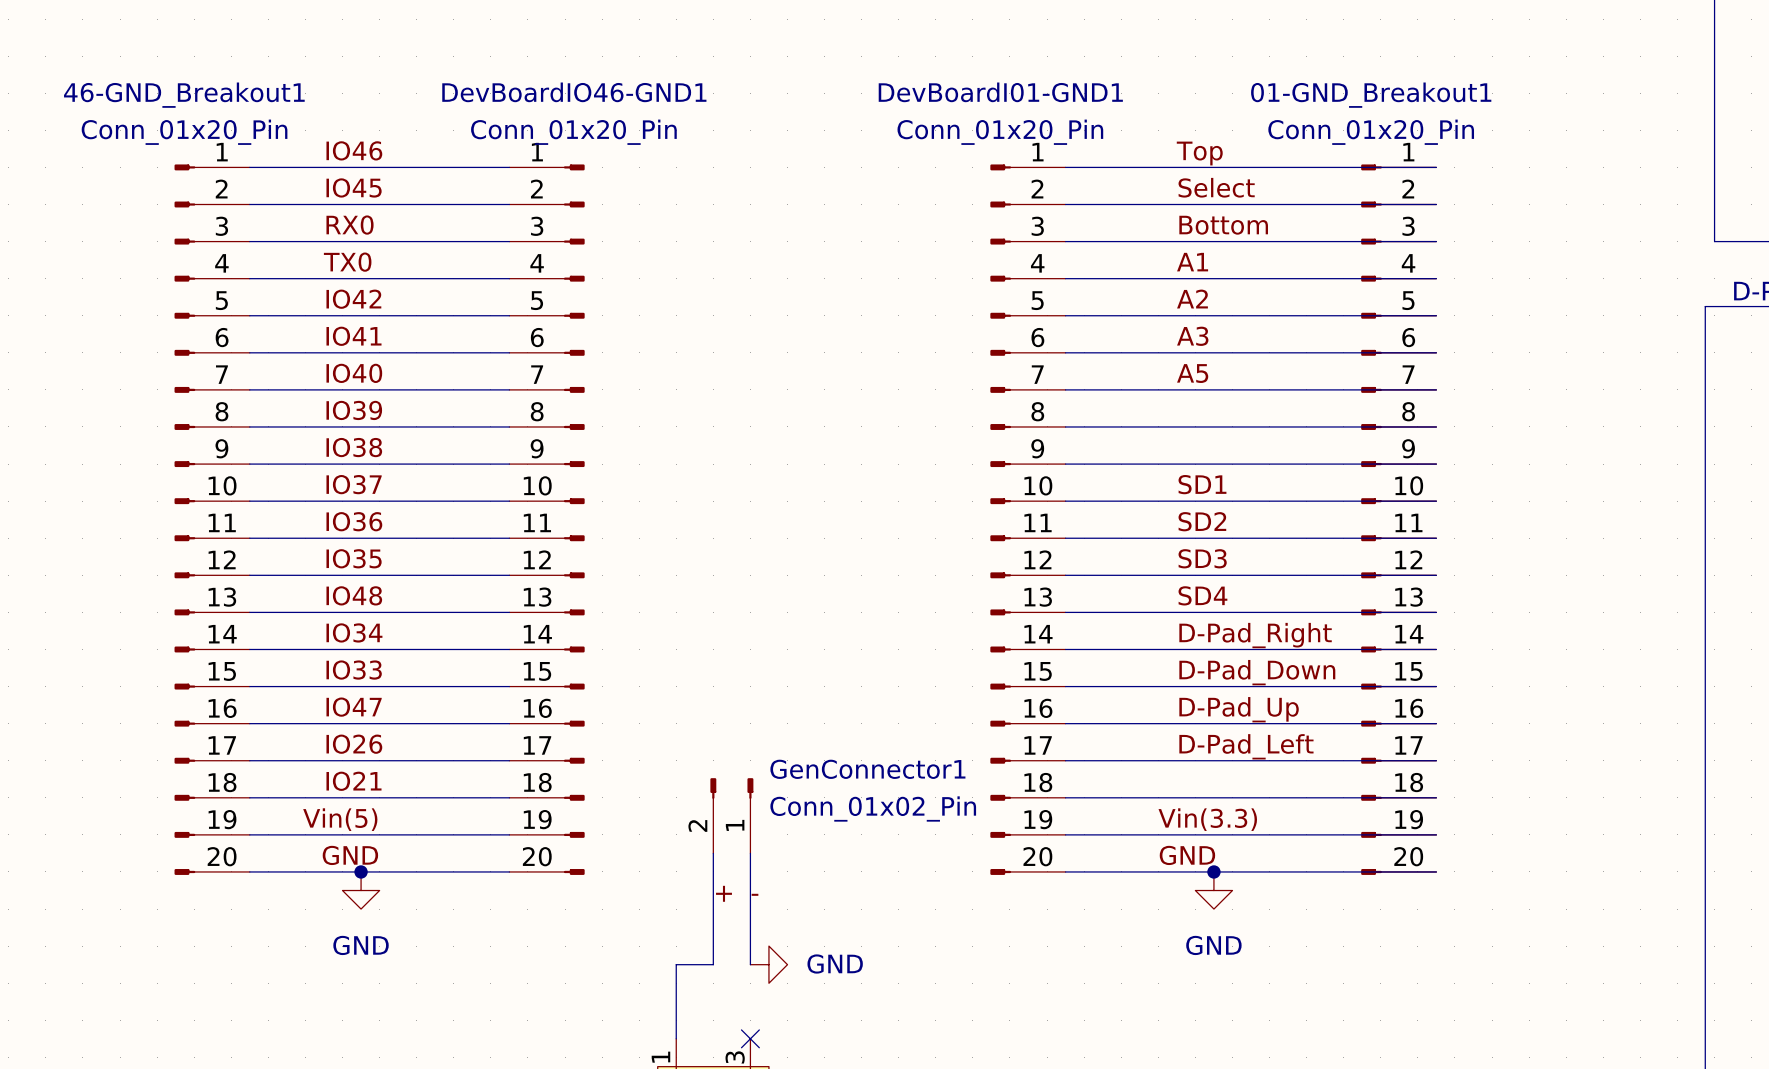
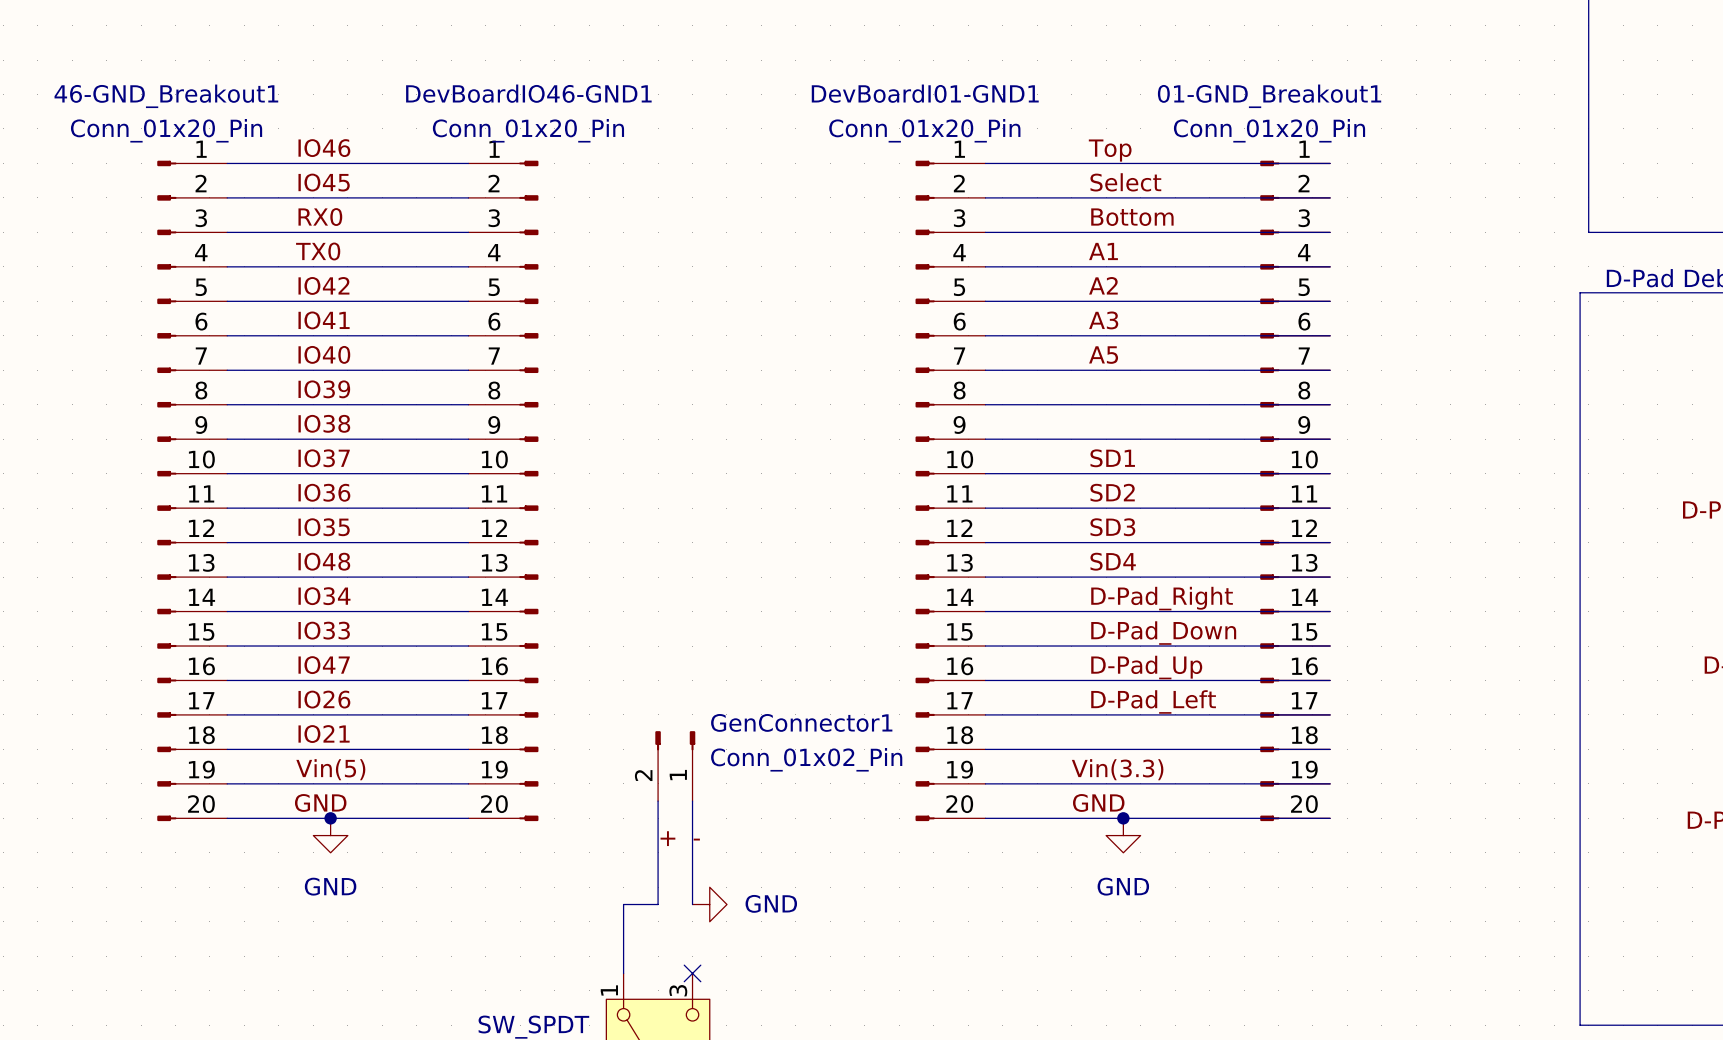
label position: Vin(5) (340, 819) -> Vin(5) (330, 769)

